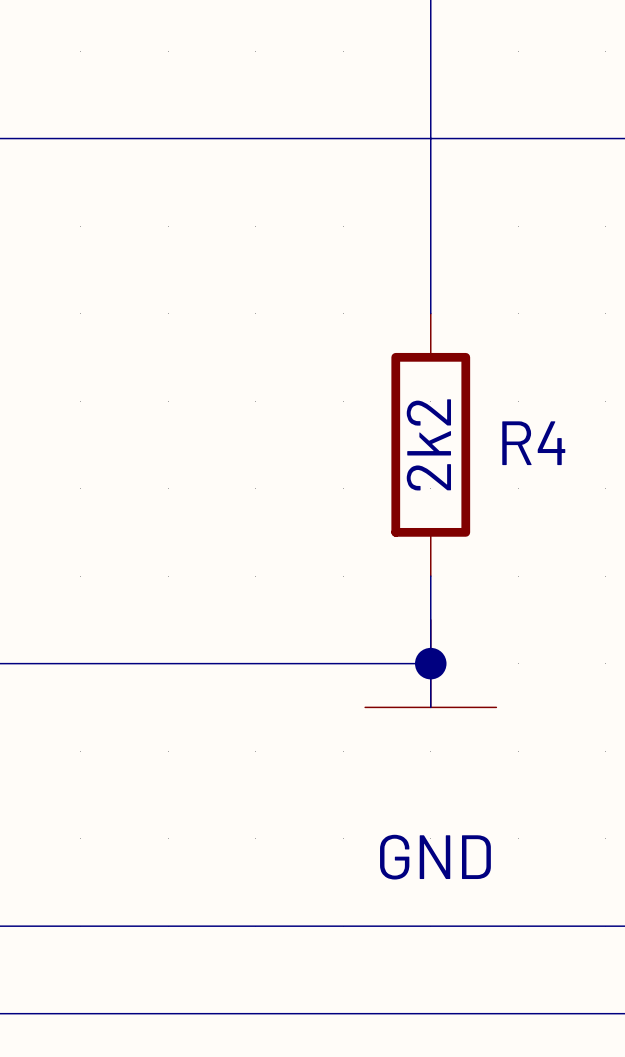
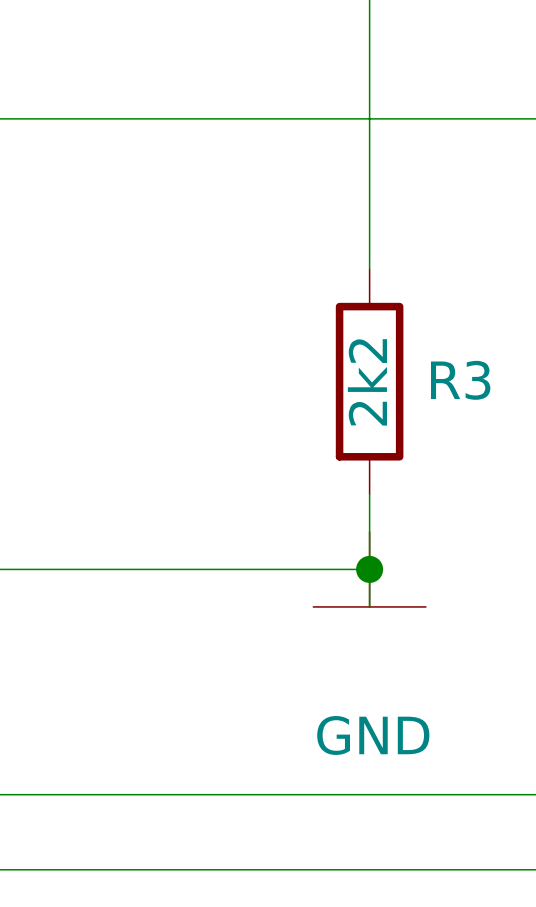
R4 name: R4 (533, 443) -> R3 (460, 380)

